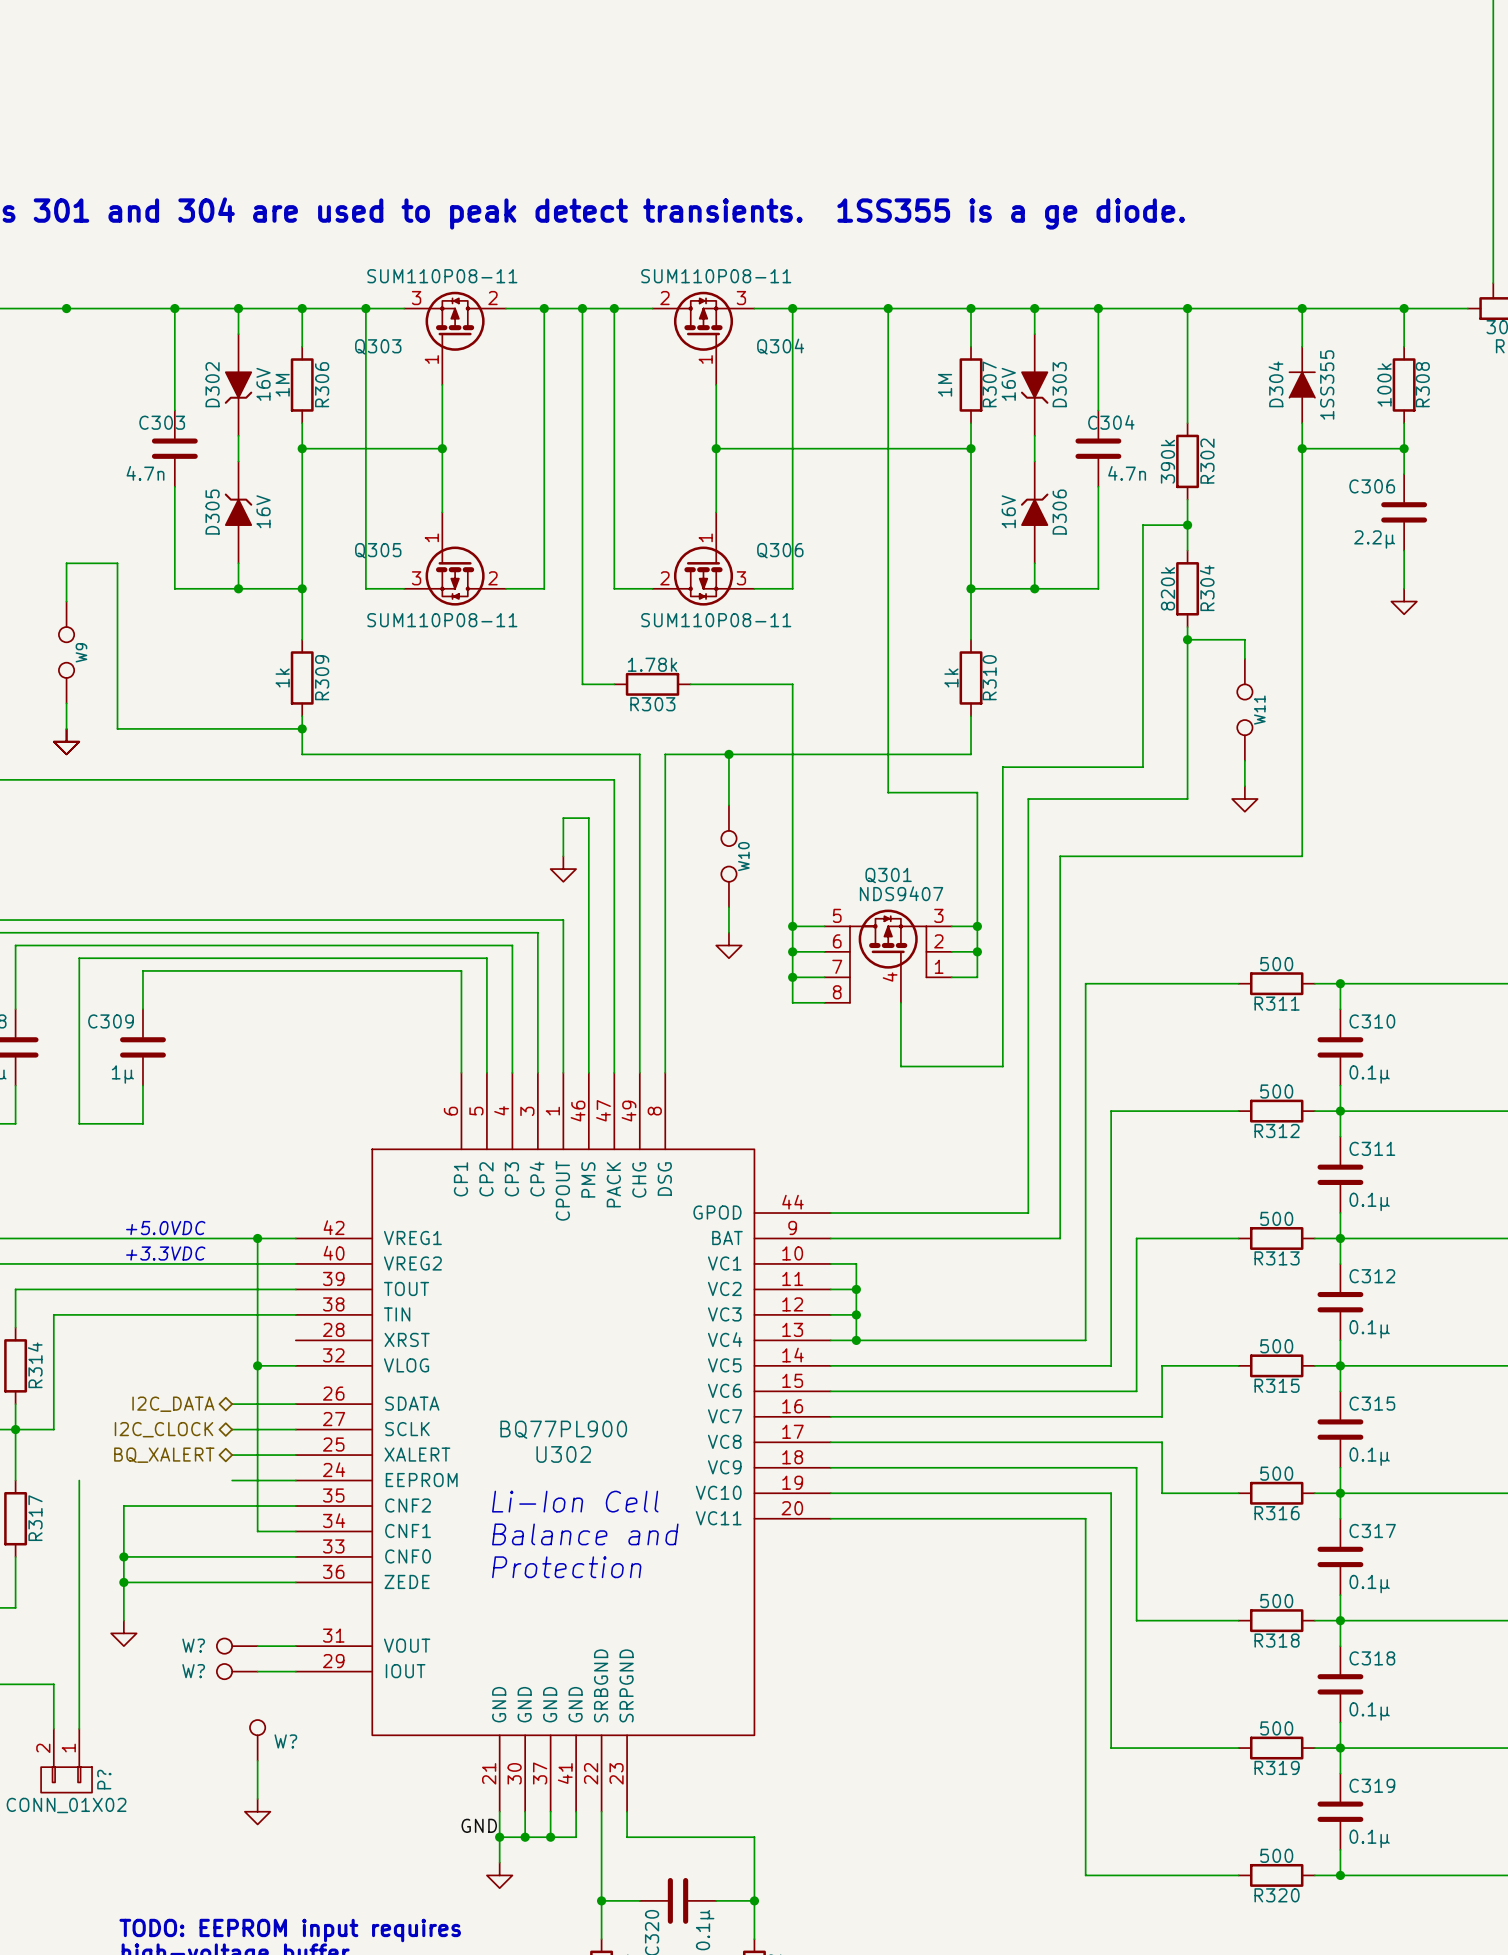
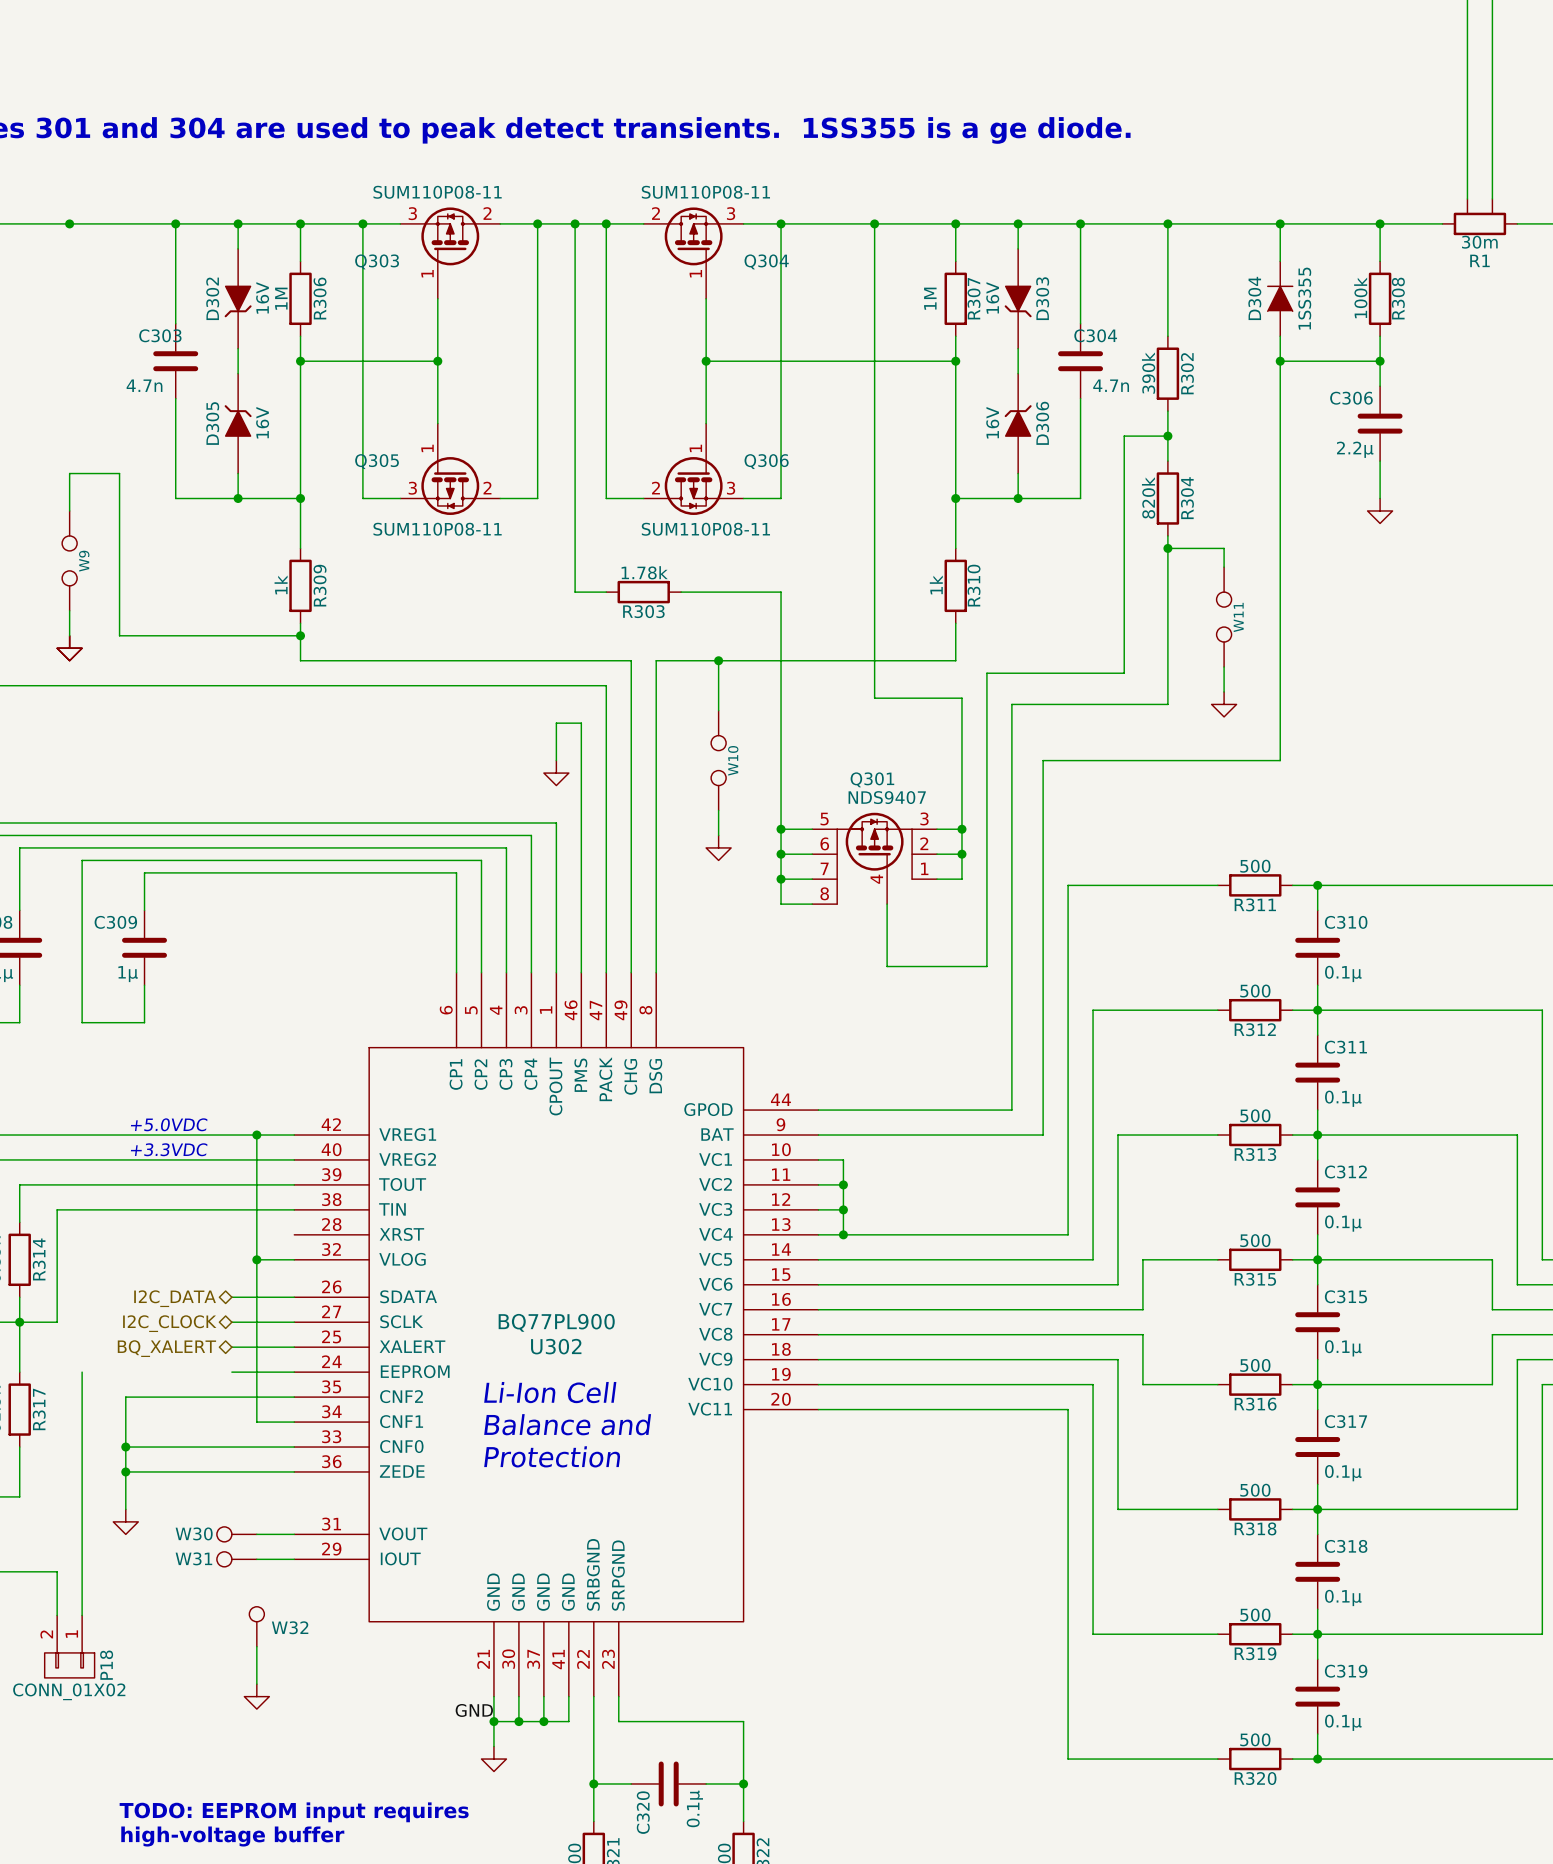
W? name: W? (193, 1645) -> W30 (194, 1533)
W? name: W? (193, 1671) -> W31 (193, 1558)
W? name: W? (285, 1741) -> W32 (290, 1627)
P? name: P? (104, 1779) -> P18 (106, 1665)

